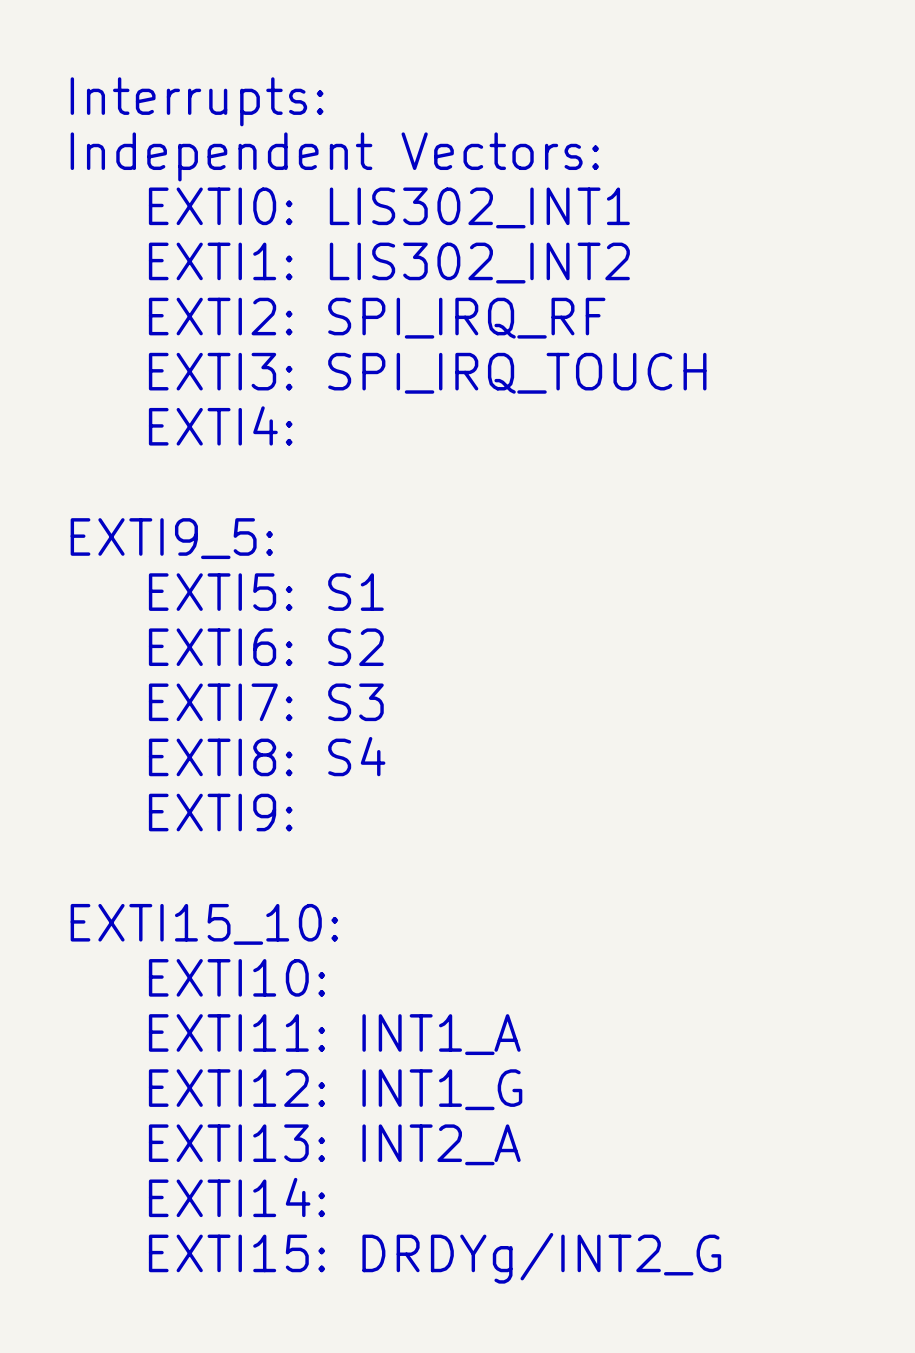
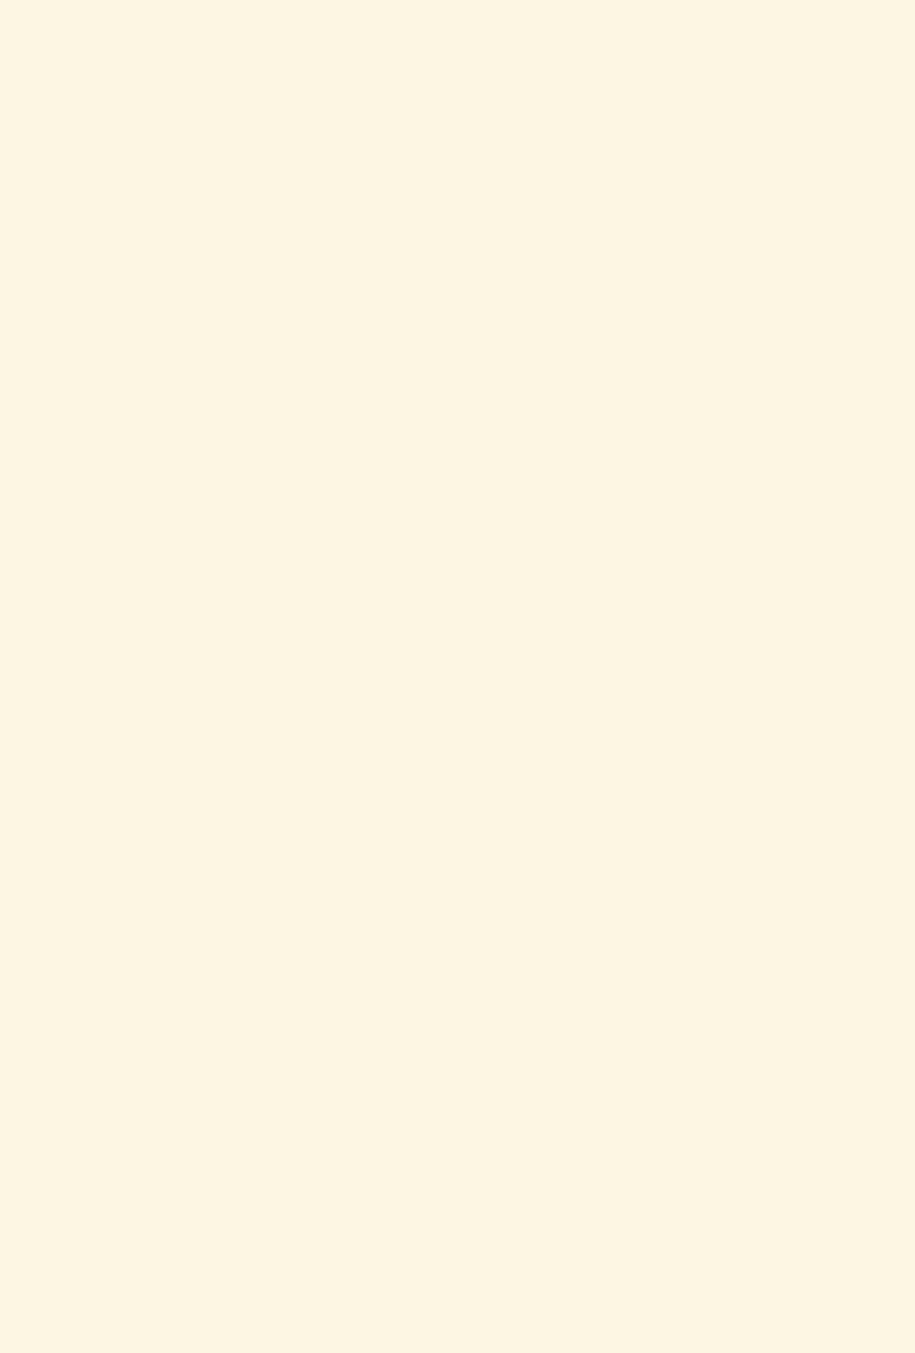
text: Interrupts: (197, 101) -> none
text: Independent Vectors: (334, 156) -> none
text: EXTI0: LIS302_INT1 (389, 207) -> none
text: EXTI1: LIS302_INT2 (389, 263) -> none
text: EXTI2: SPI_IRQ_RF (377, 318) -> none
text: EXTI3: SPI_IRQ_TOUCH (427, 373) -> none
text: EXTI4: (220, 425) -> none
text: EXTI9_5: (171, 538) -> none
text: EXTI5: S1 (266, 592) -> none
text: EXTI6: S2 (266, 647) -> none
text: EXTI7: S3 (266, 702) -> none
text: EXTI8: S4 (267, 756) -> none
text: EXTI9: (220, 812) -> none
text: EXTI15_10: (204, 924) -> none
text: EXTI10: (236, 977) -> none
text: EXTI11: INT1_A (334, 1034) -> none
text: EXTI12: INT1_G (335, 1089) -> none
text: EXTI13: INT2_A (334, 1144) -> none
text: EXTI14: (236, 1197) -> none
text: EXTI15: DRDYg/INT2_G (435, 1258) -> none

